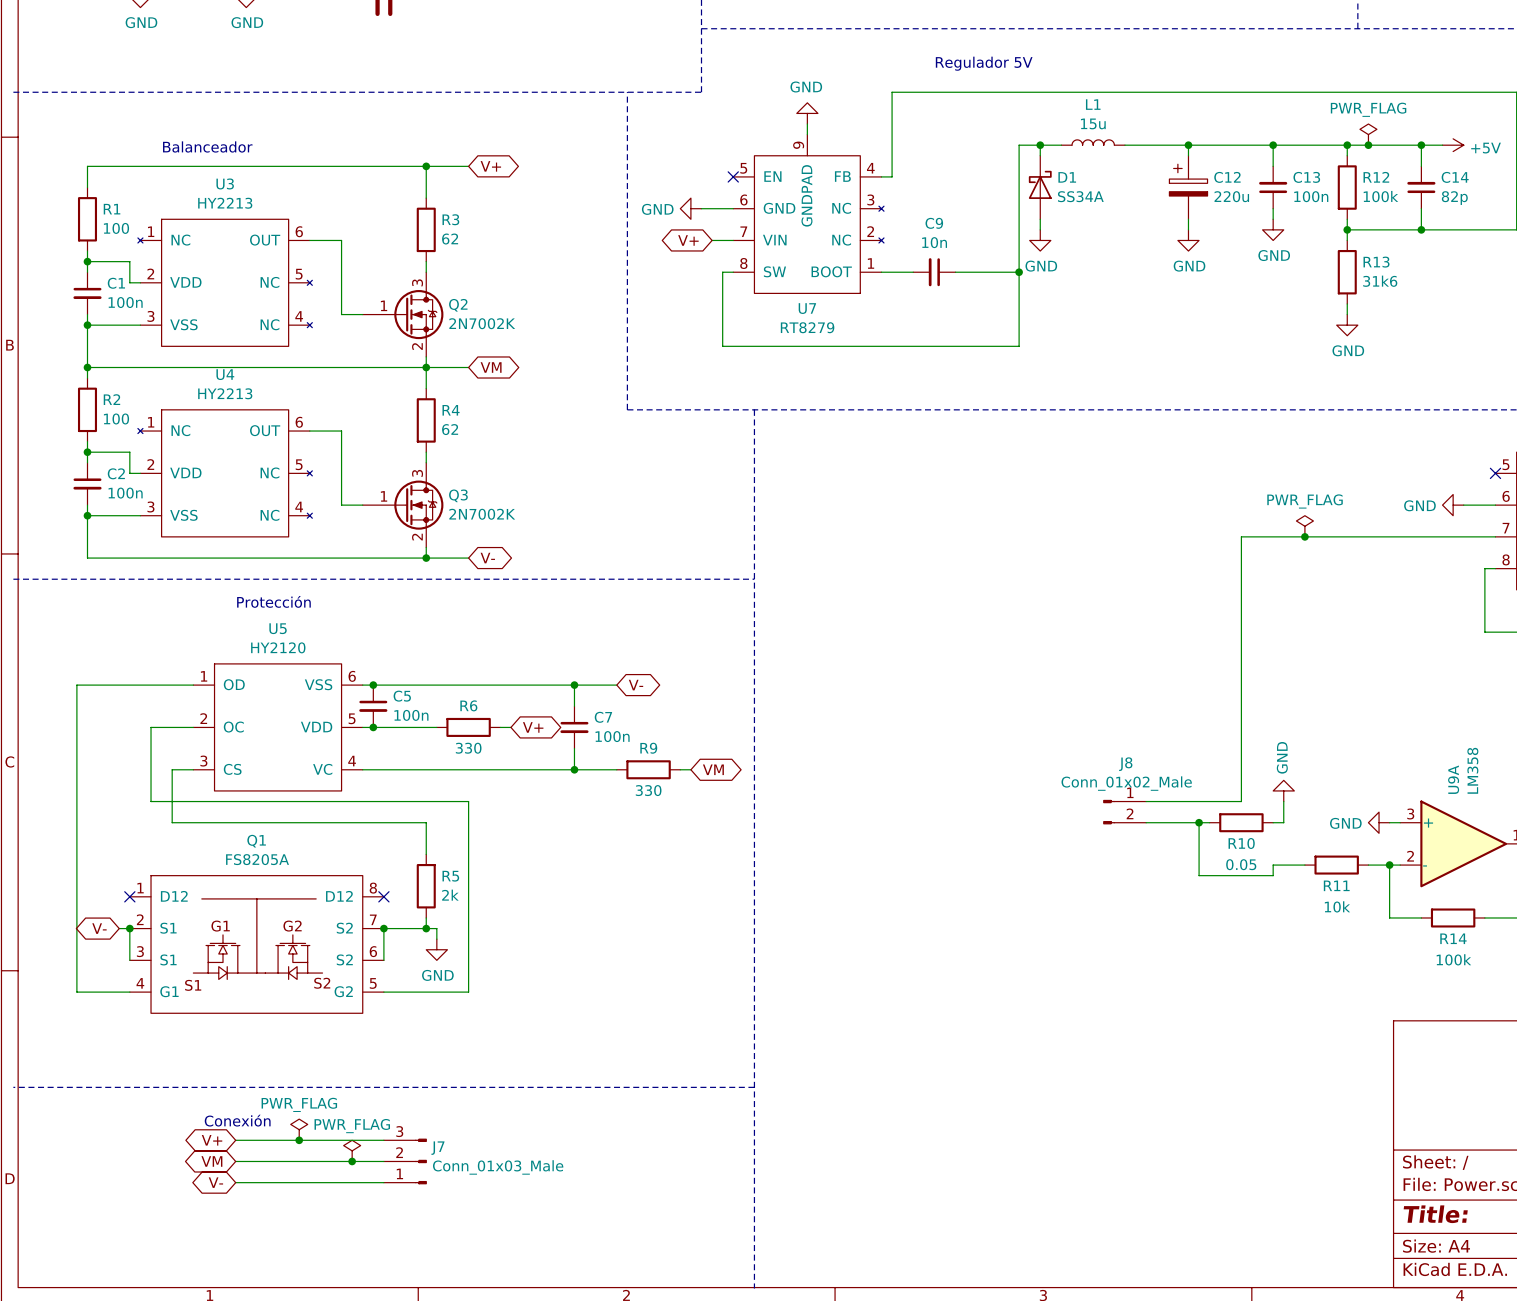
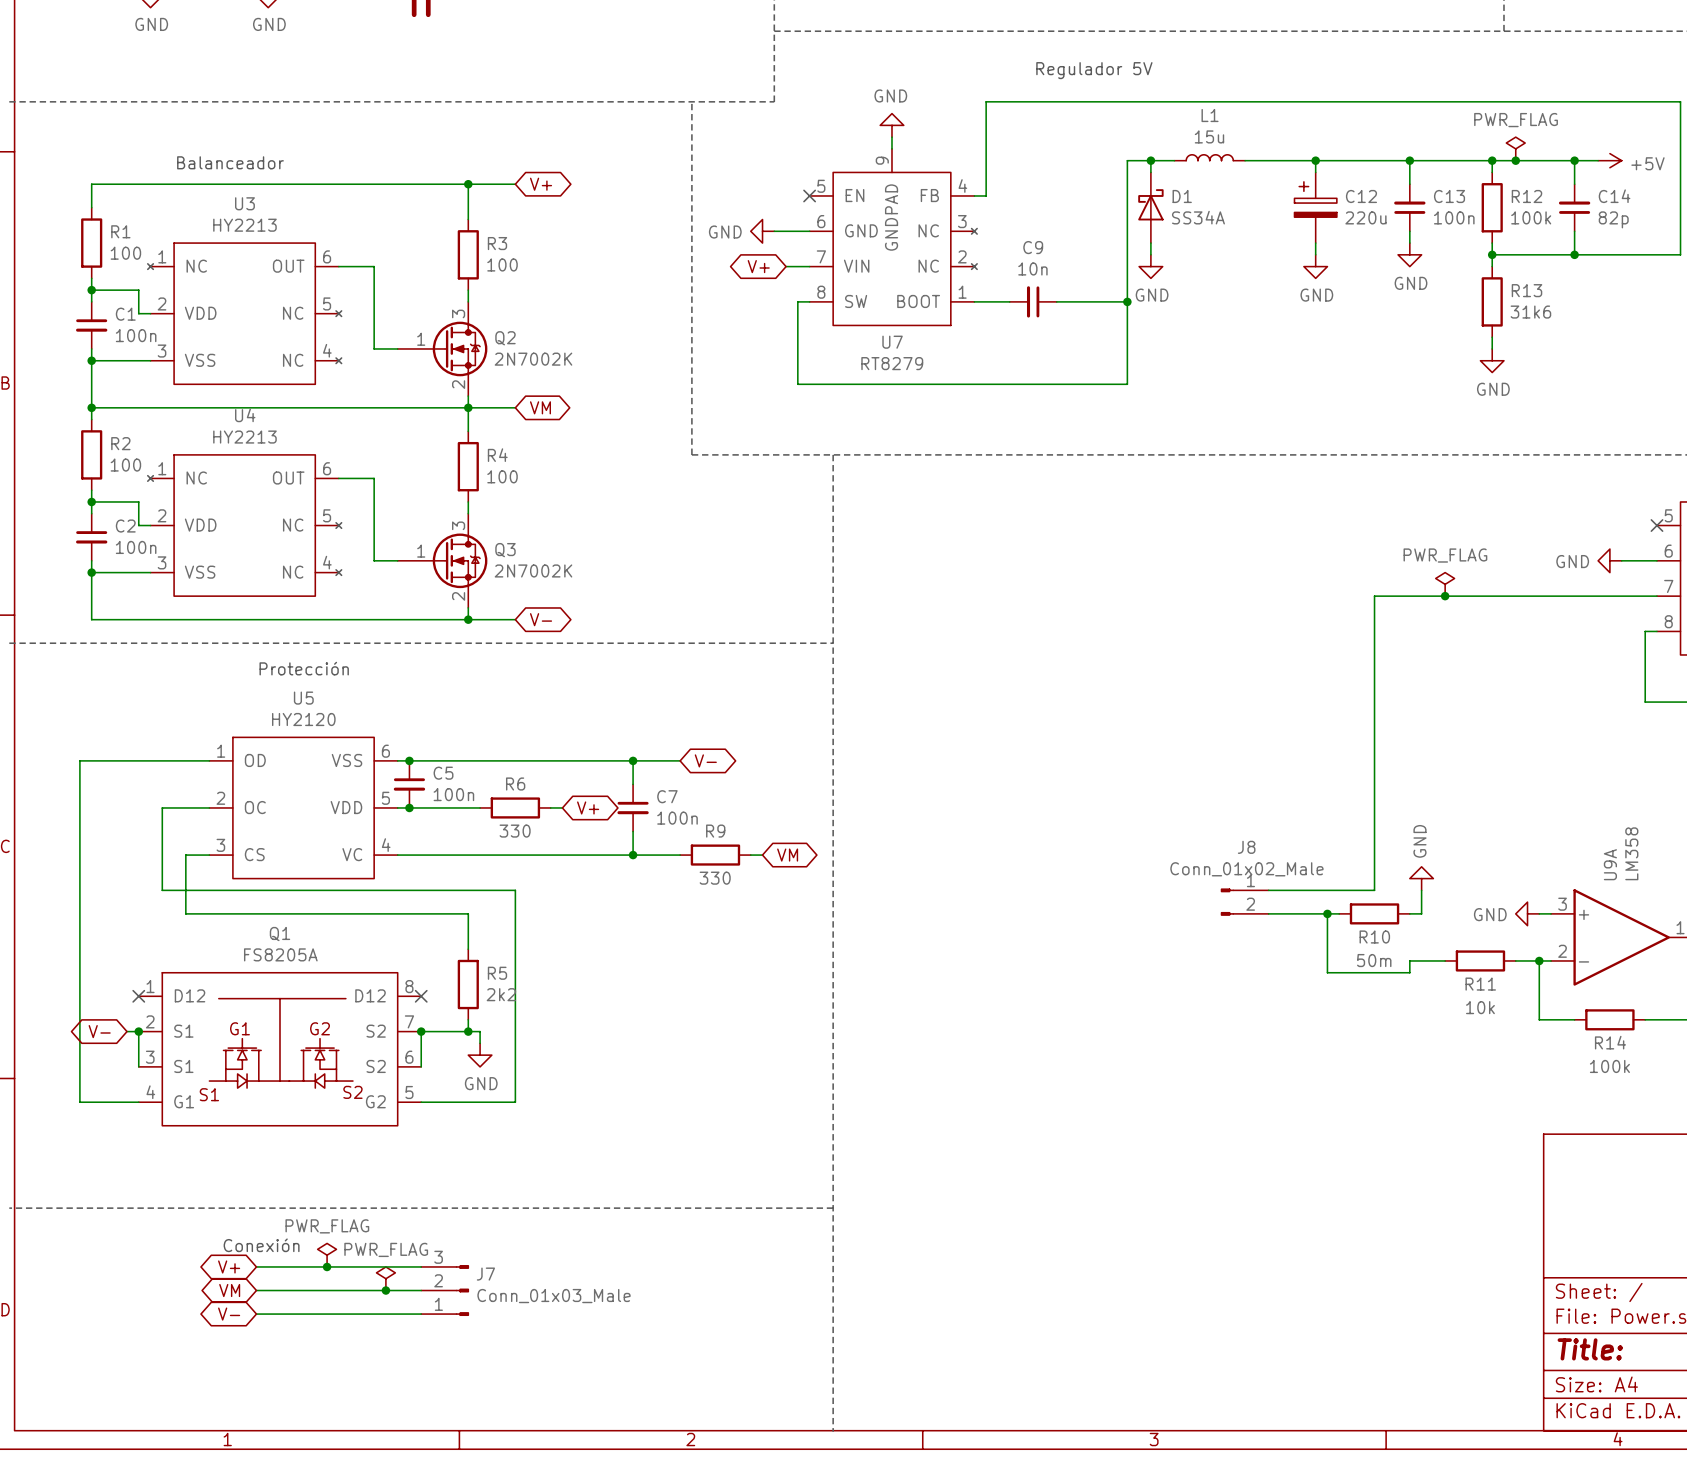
R3 value: 62 (450, 239) -> 100 (502, 264)
R4 value: 62 (450, 429) -> 100 (502, 476)
R10 value: 0.05 (1241, 864) -> 50m (1374, 960)
R5 value: 2k (450, 895) -> 2k2 (501, 994)

